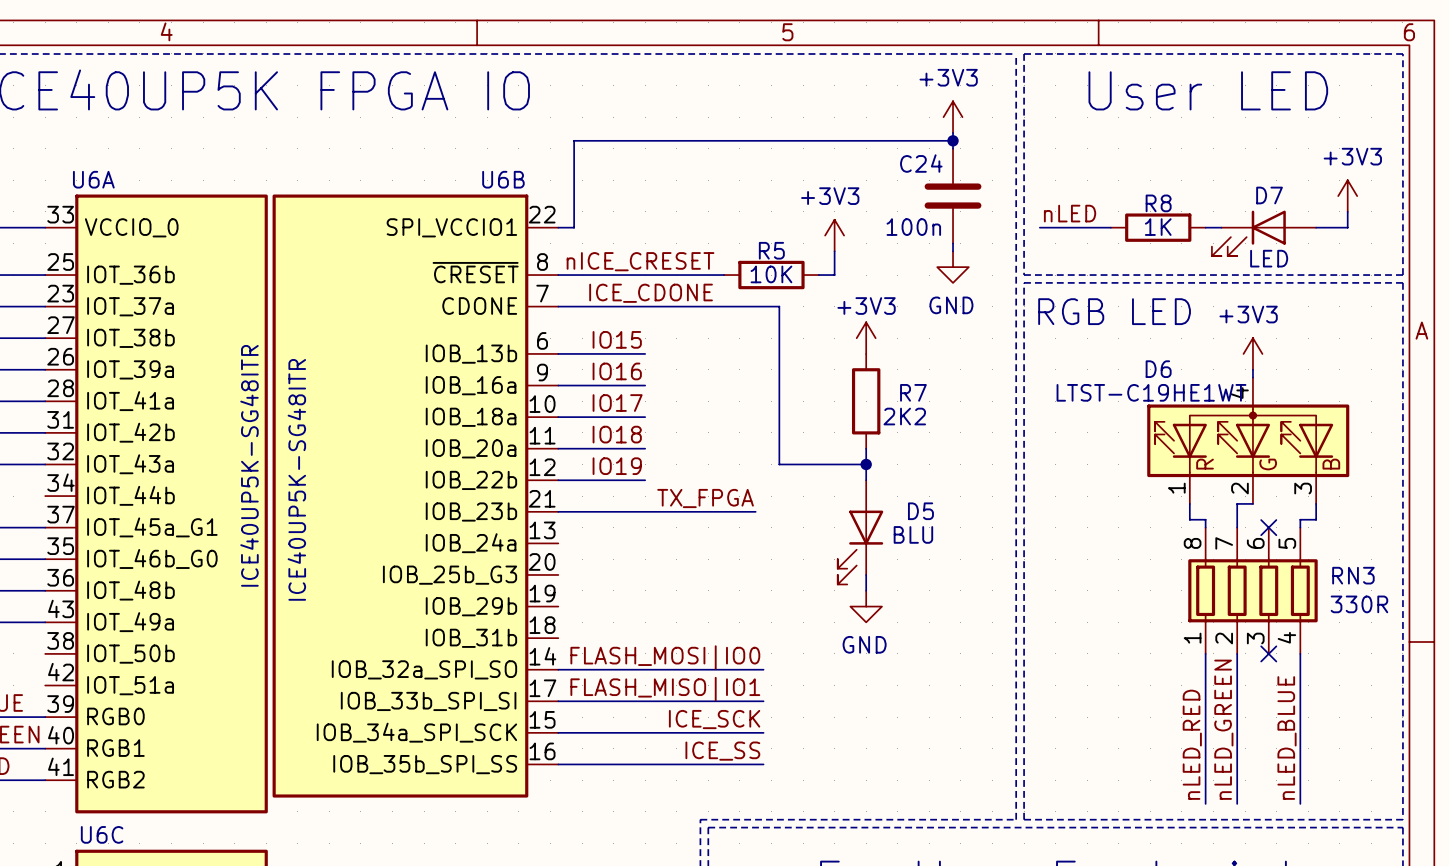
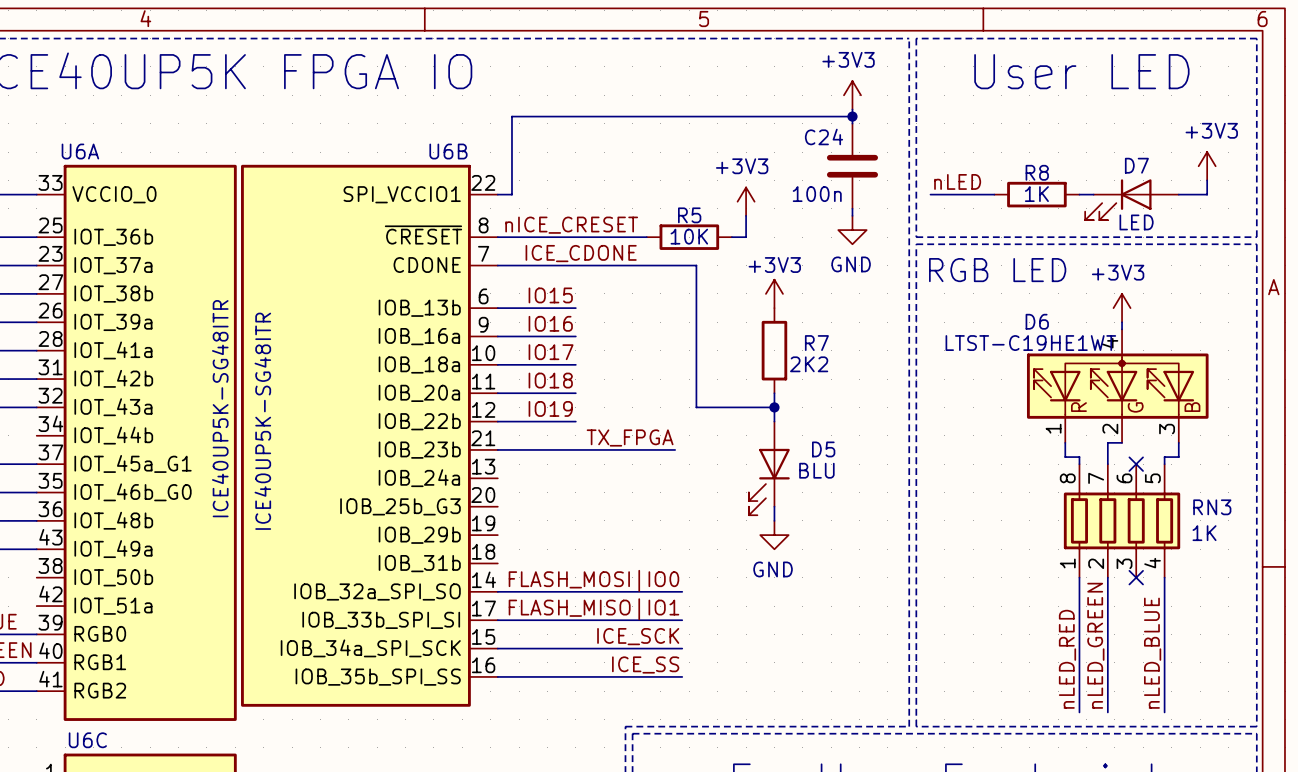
RN3 value: 330R (1359, 604) -> 1K (1204, 533)

